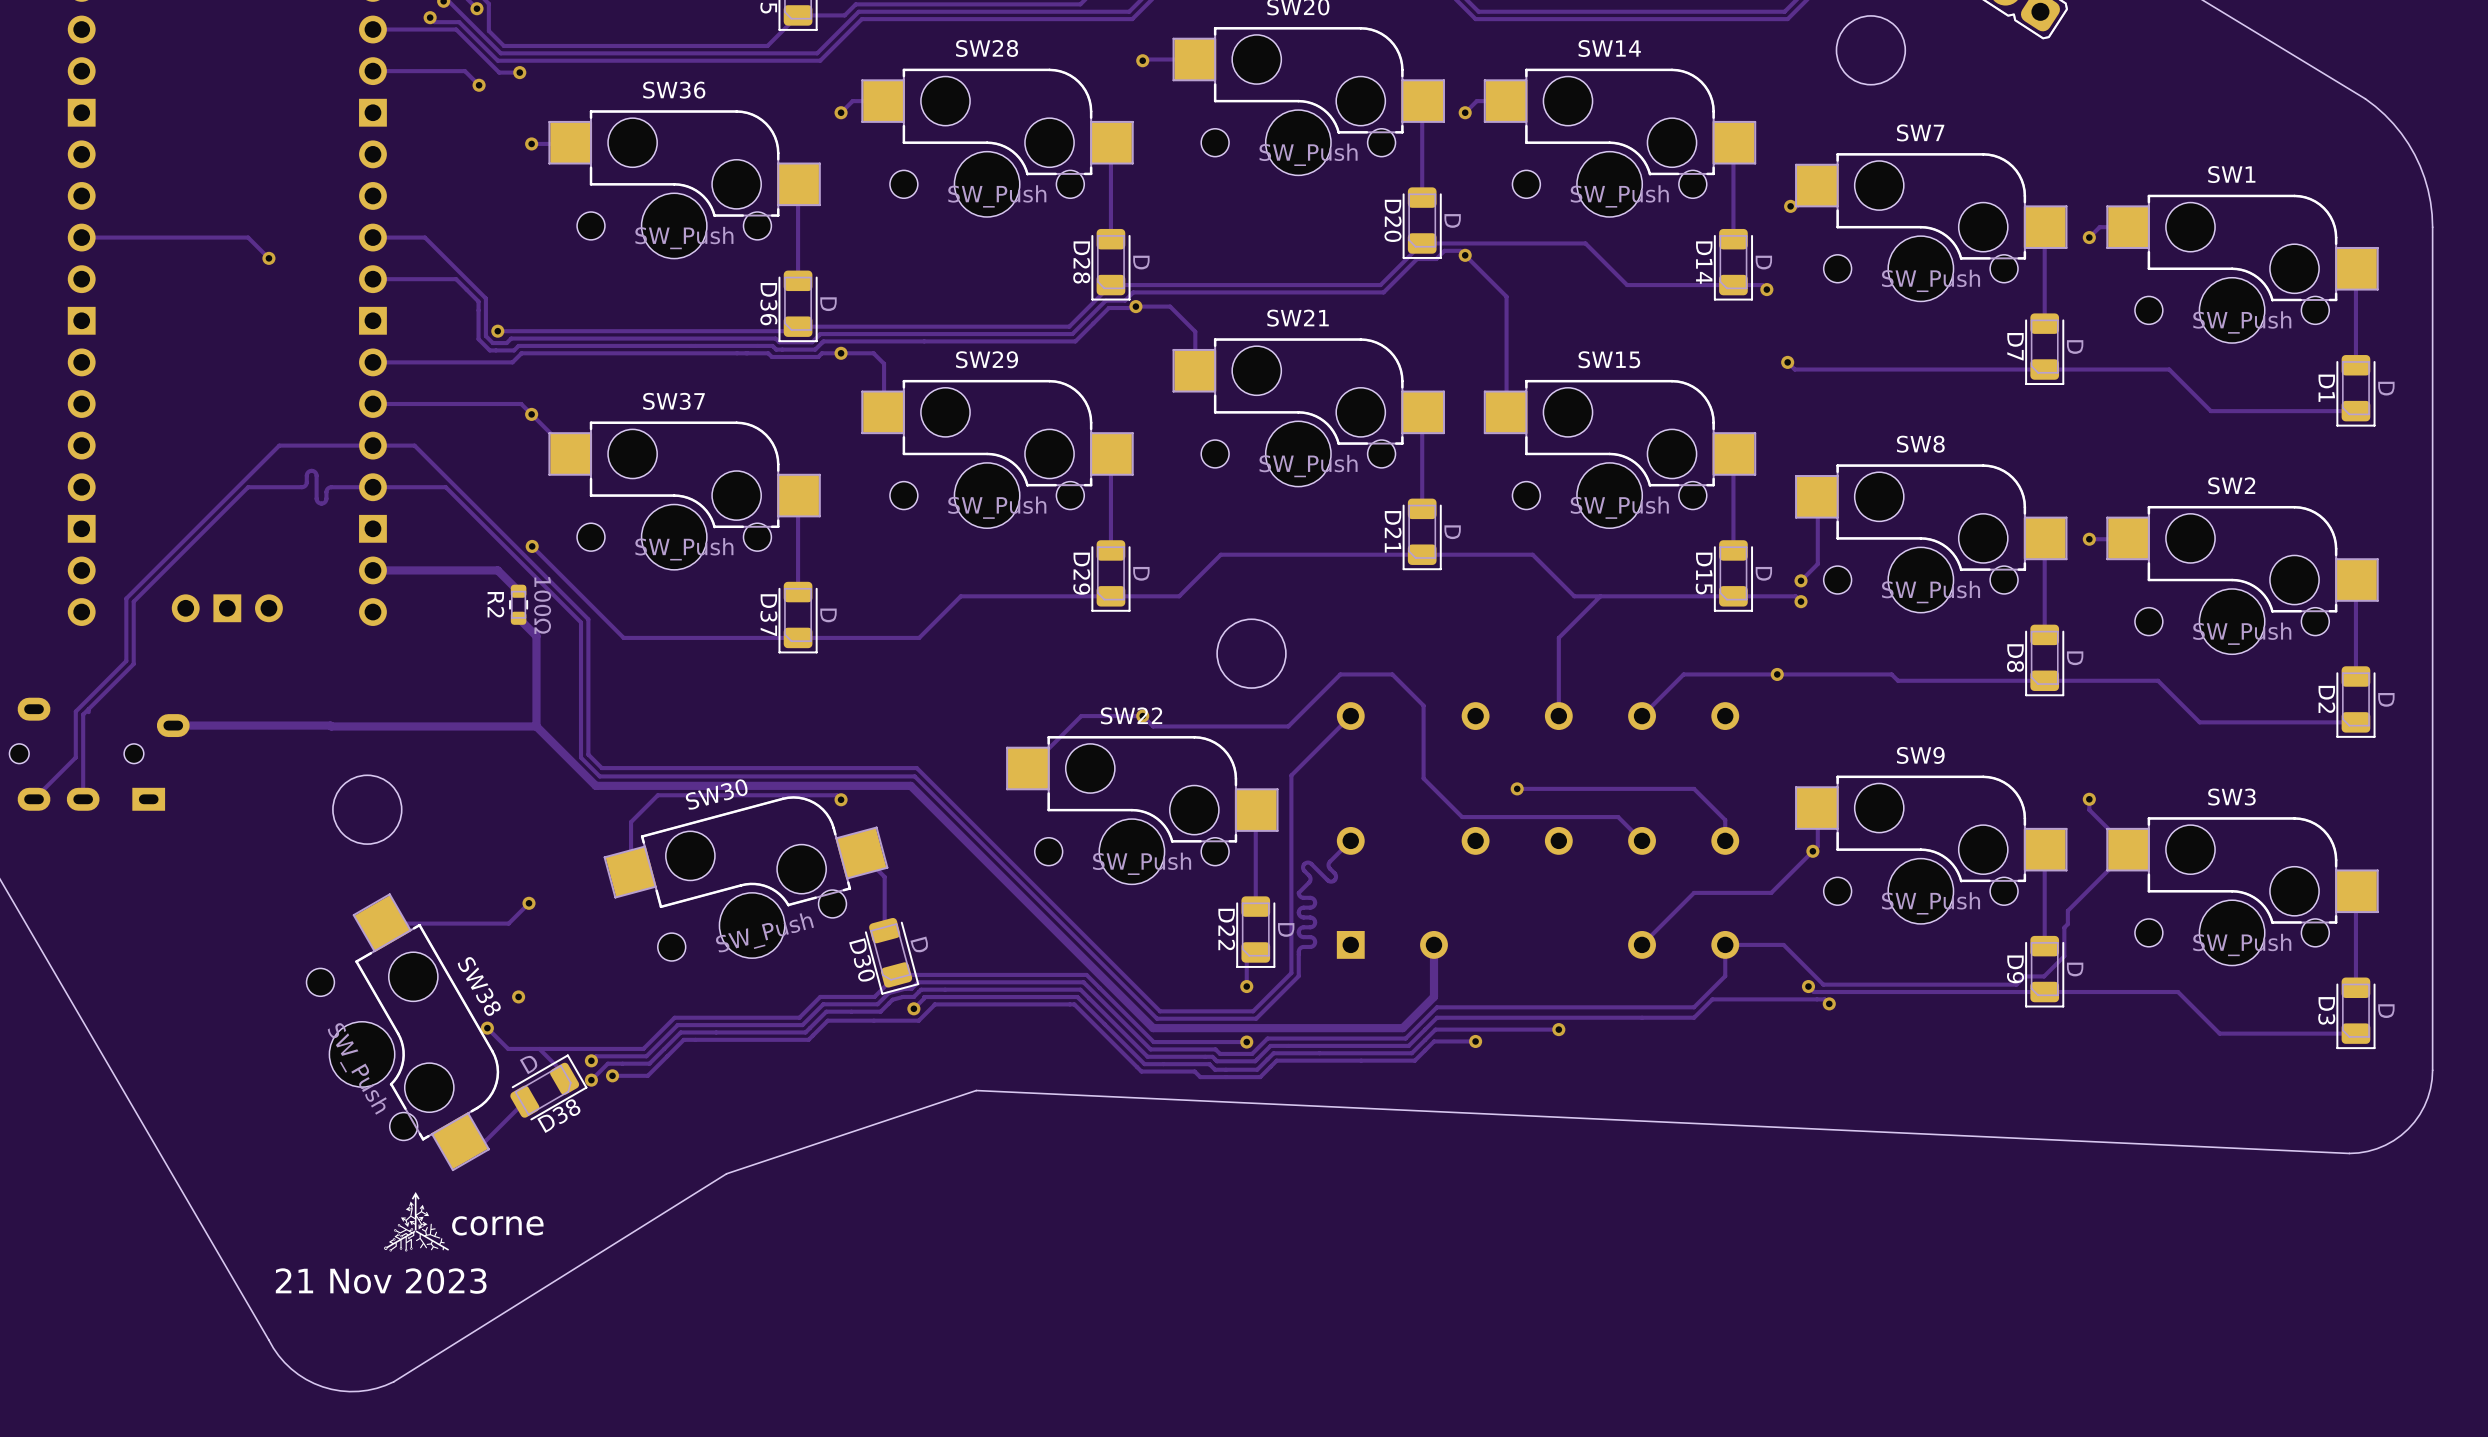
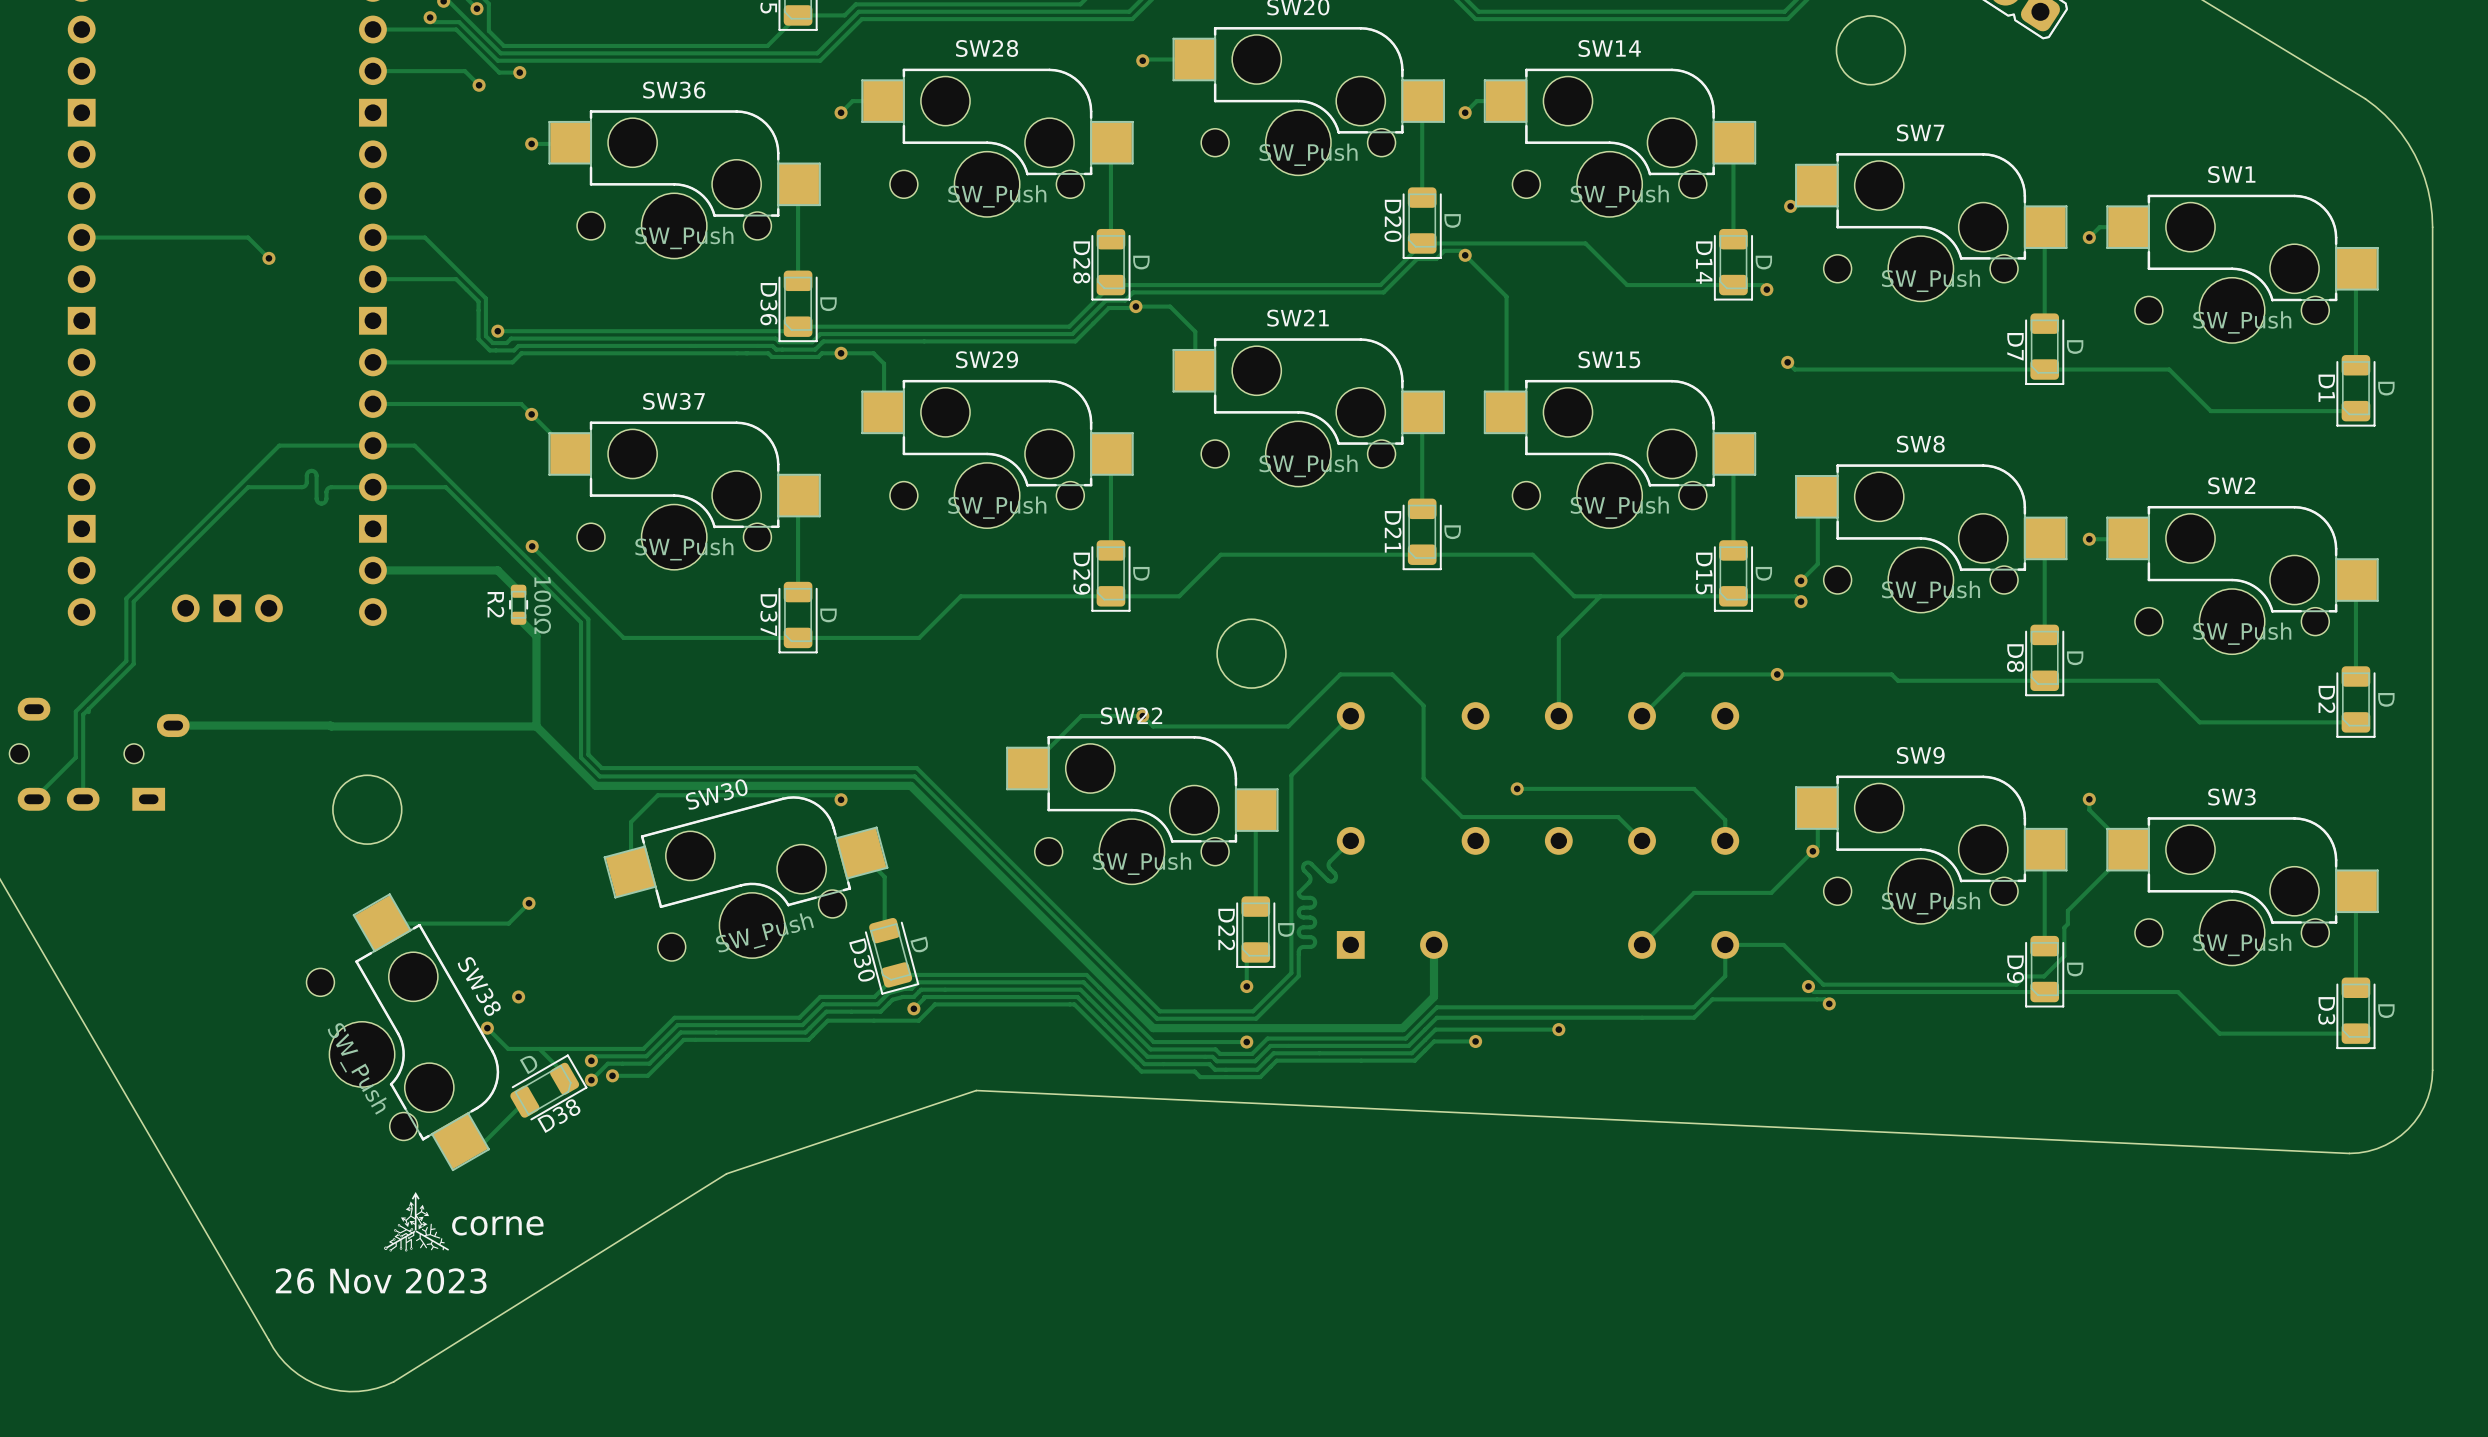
text: 21 Nov 2023 (381, 1281) -> 26 Nov 2023 (381, 1281)

